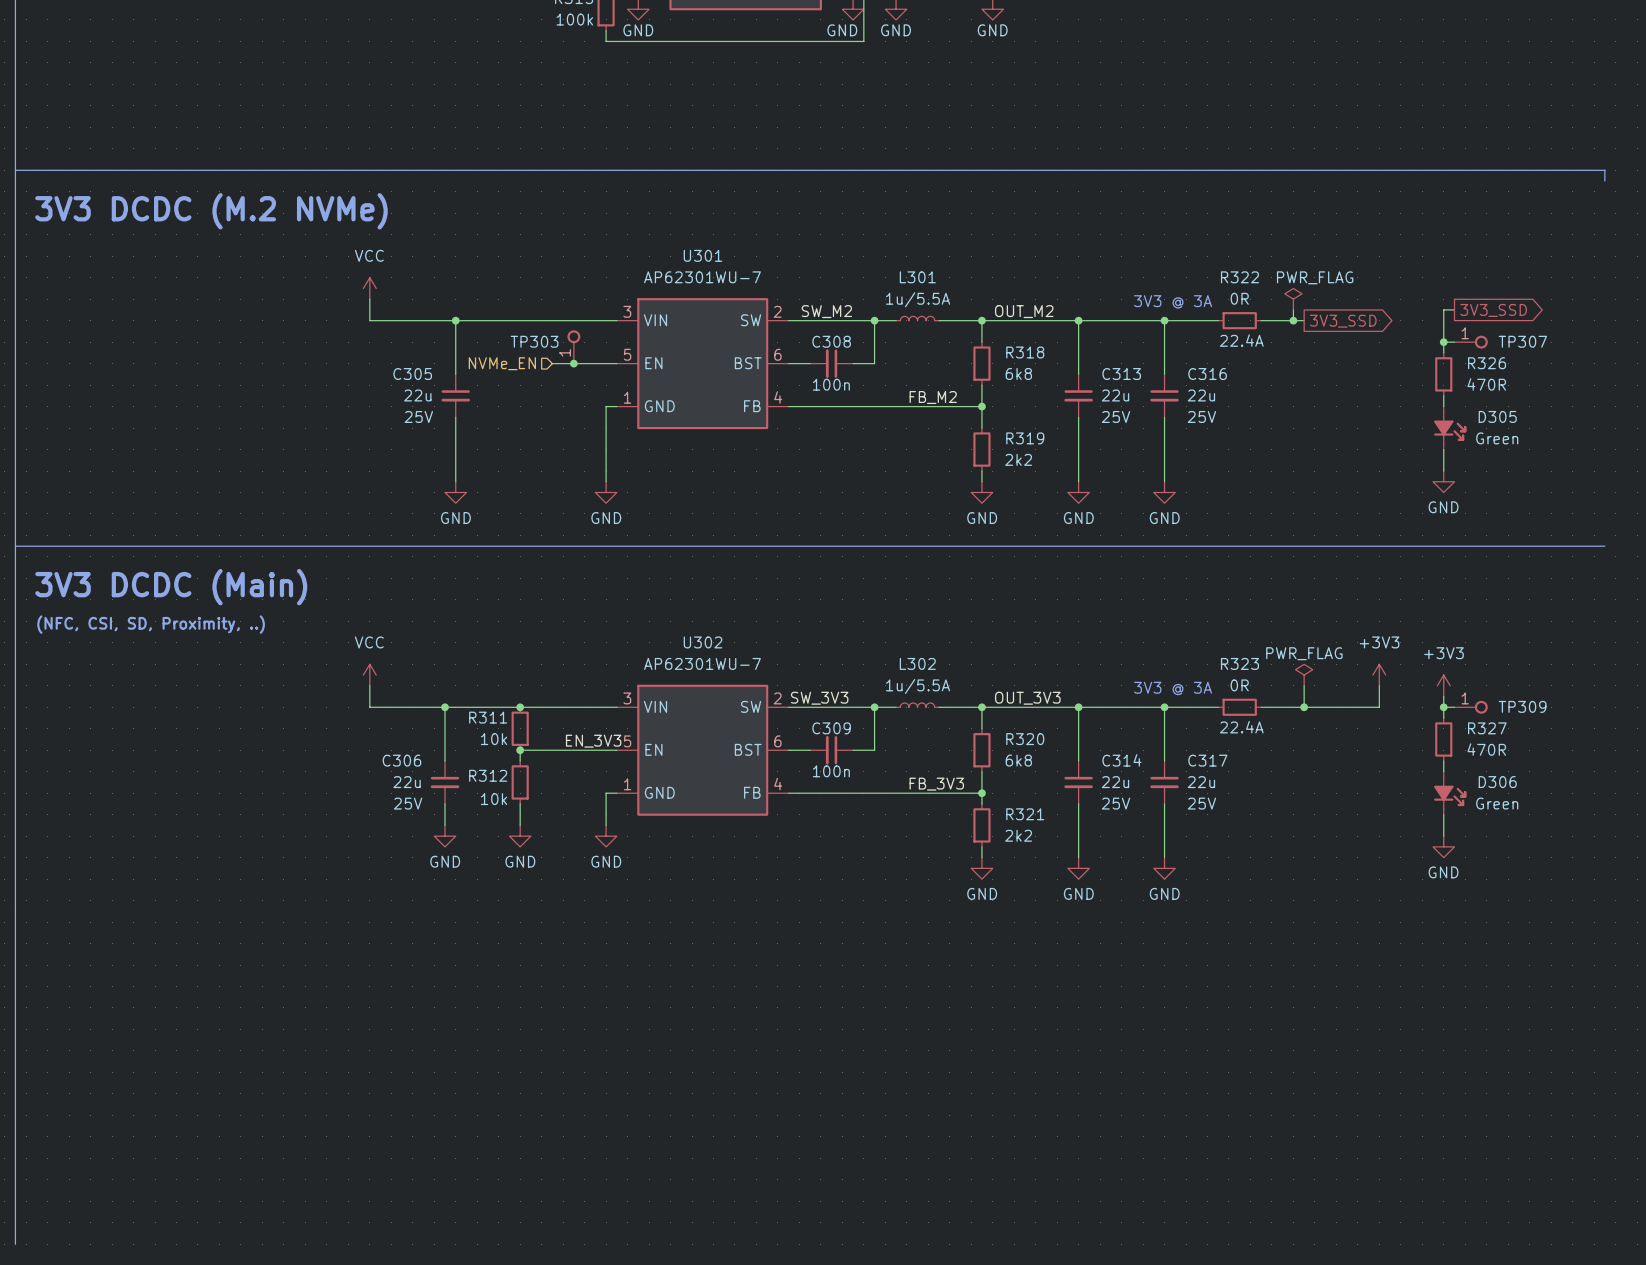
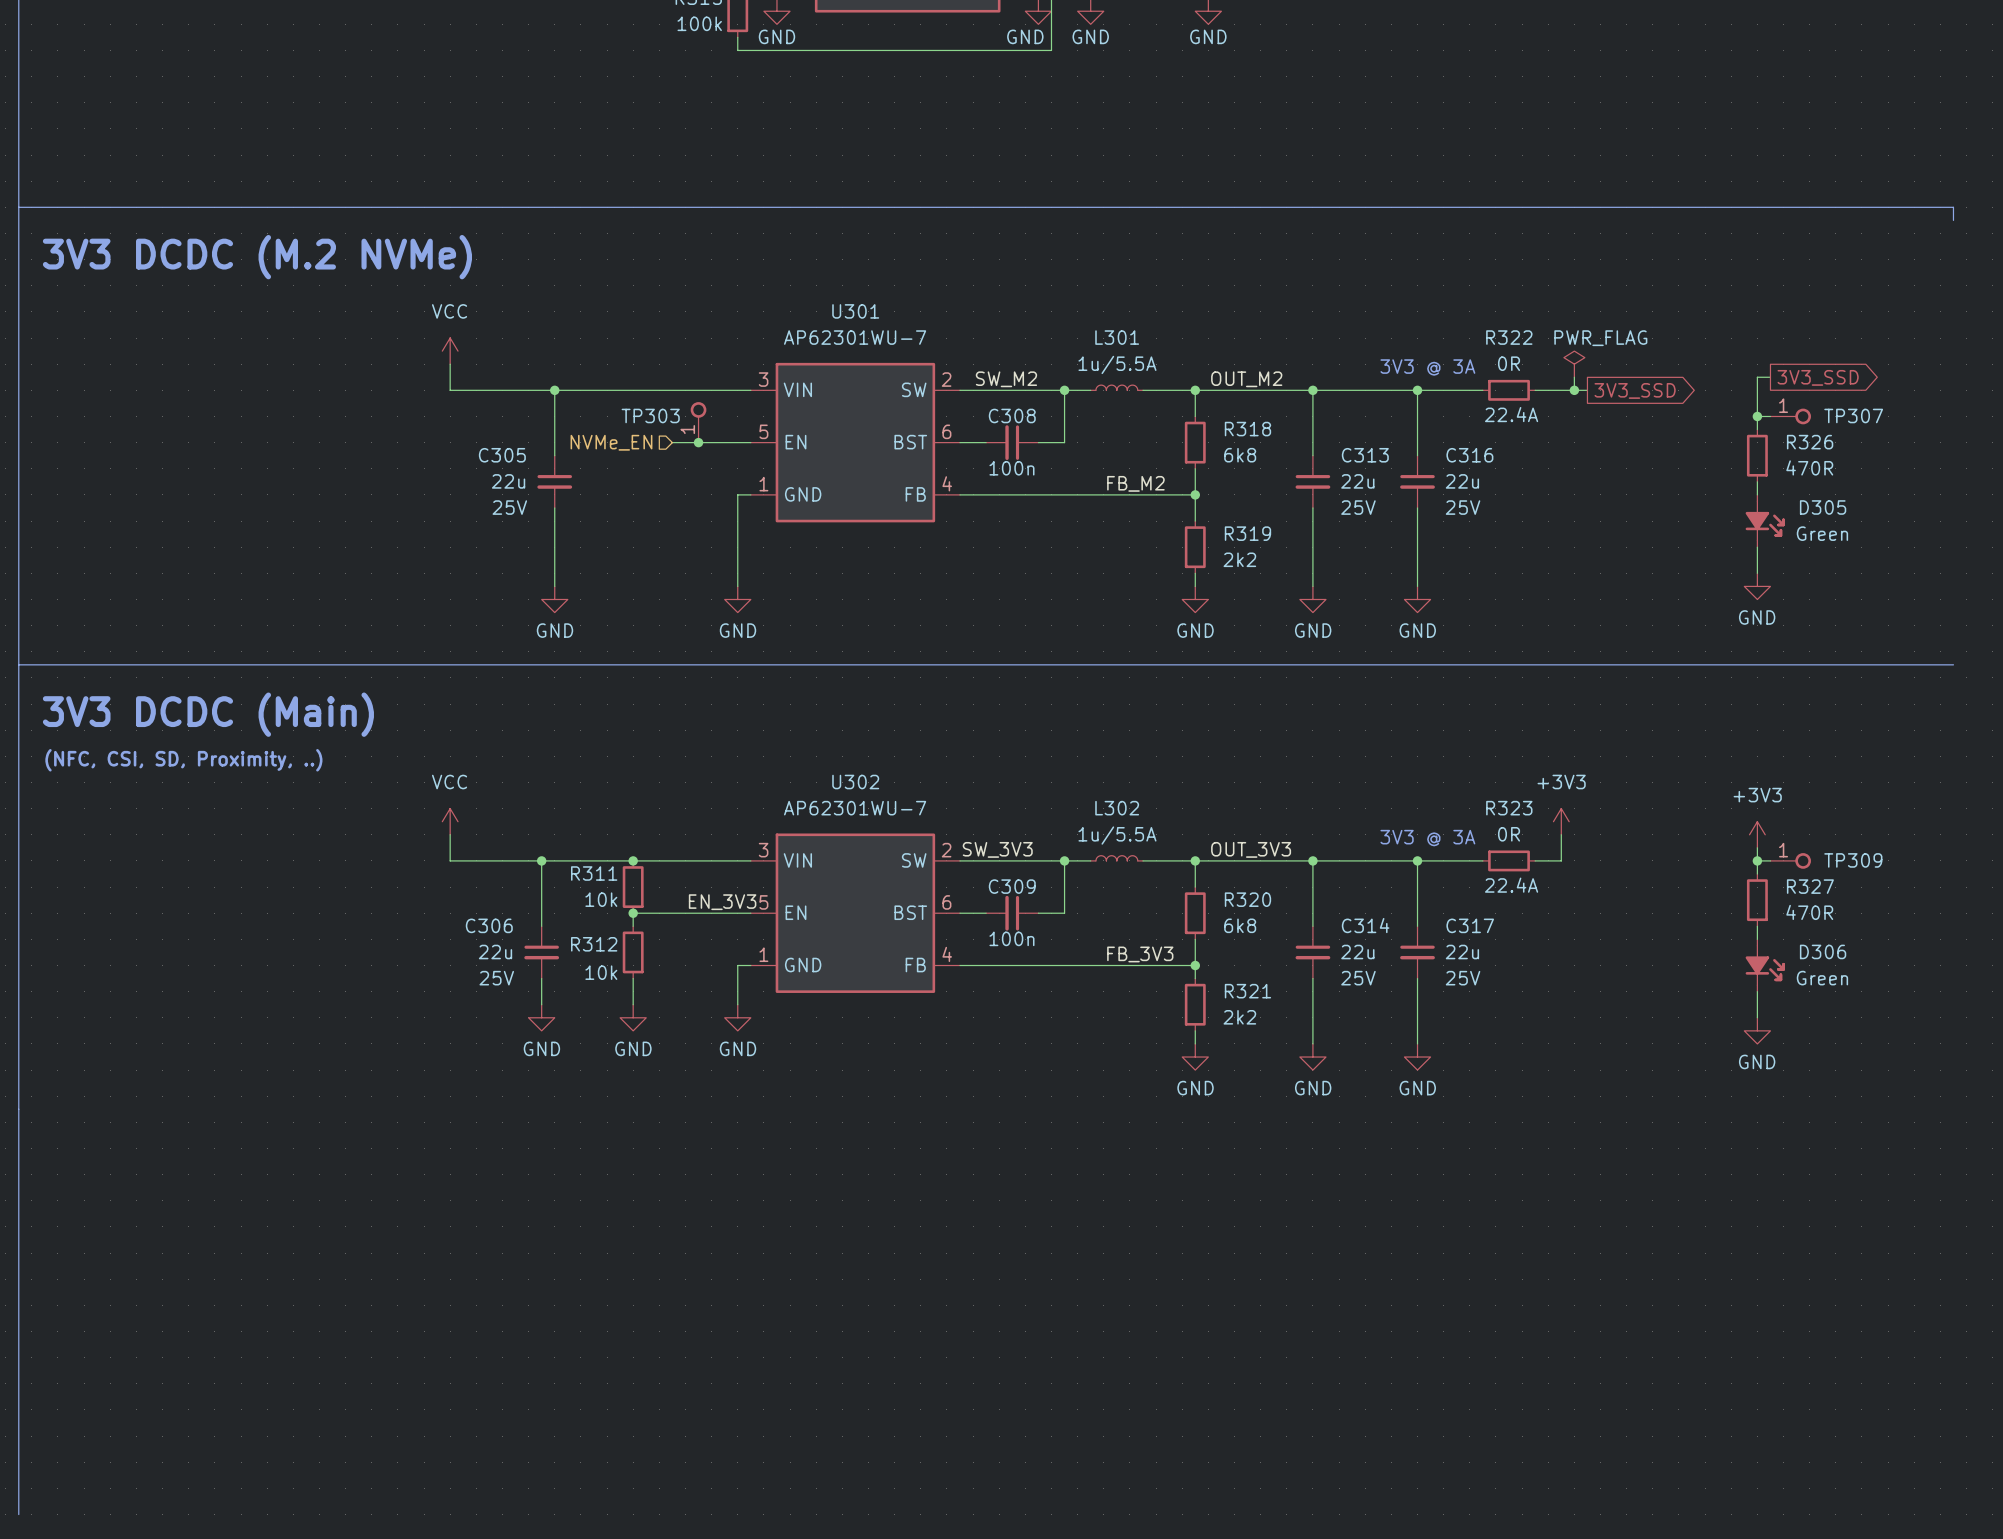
power symbol: PWR_FLAG (1304, 675) -> none
power symbol position: +3V3 (1379, 675) -> +3V3 (1561, 821)
wire: (1304, 685) (1304, 707) -> none
wire: (1379, 685) (1379, 707) (1282, 707) -> (1561, 834) (1561, 860)
junction: (1304, 707) -> none

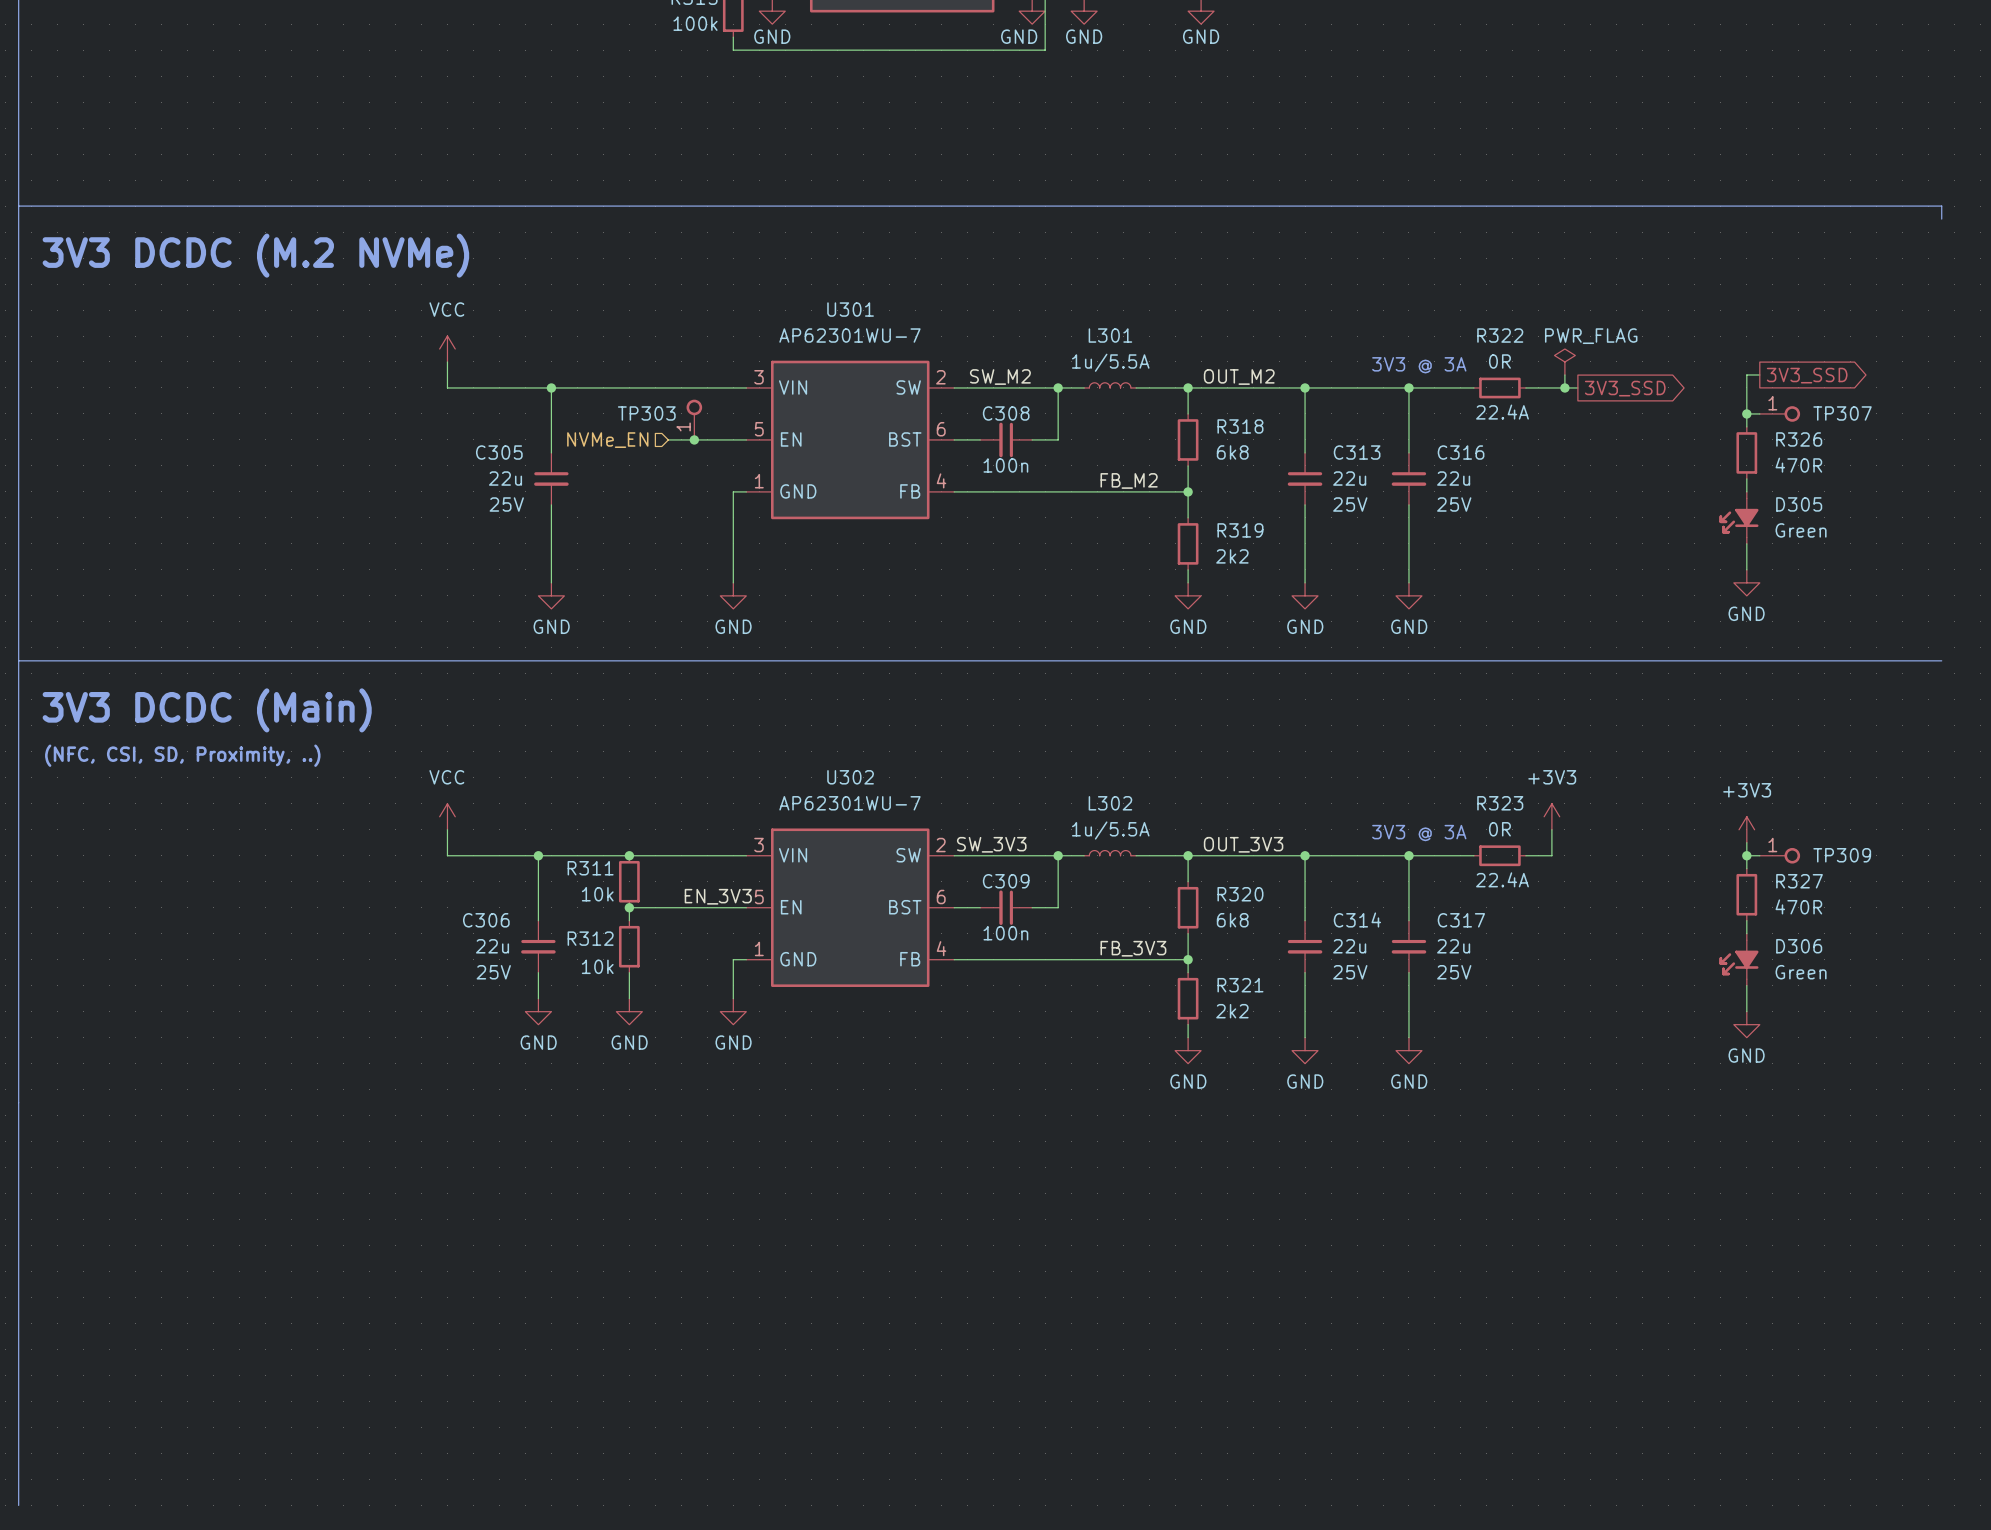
D305 flip: as is (1765, 521) -> left-right (1739, 517)
D306 flip: as is (1765, 965) -> left-right (1739, 959)

